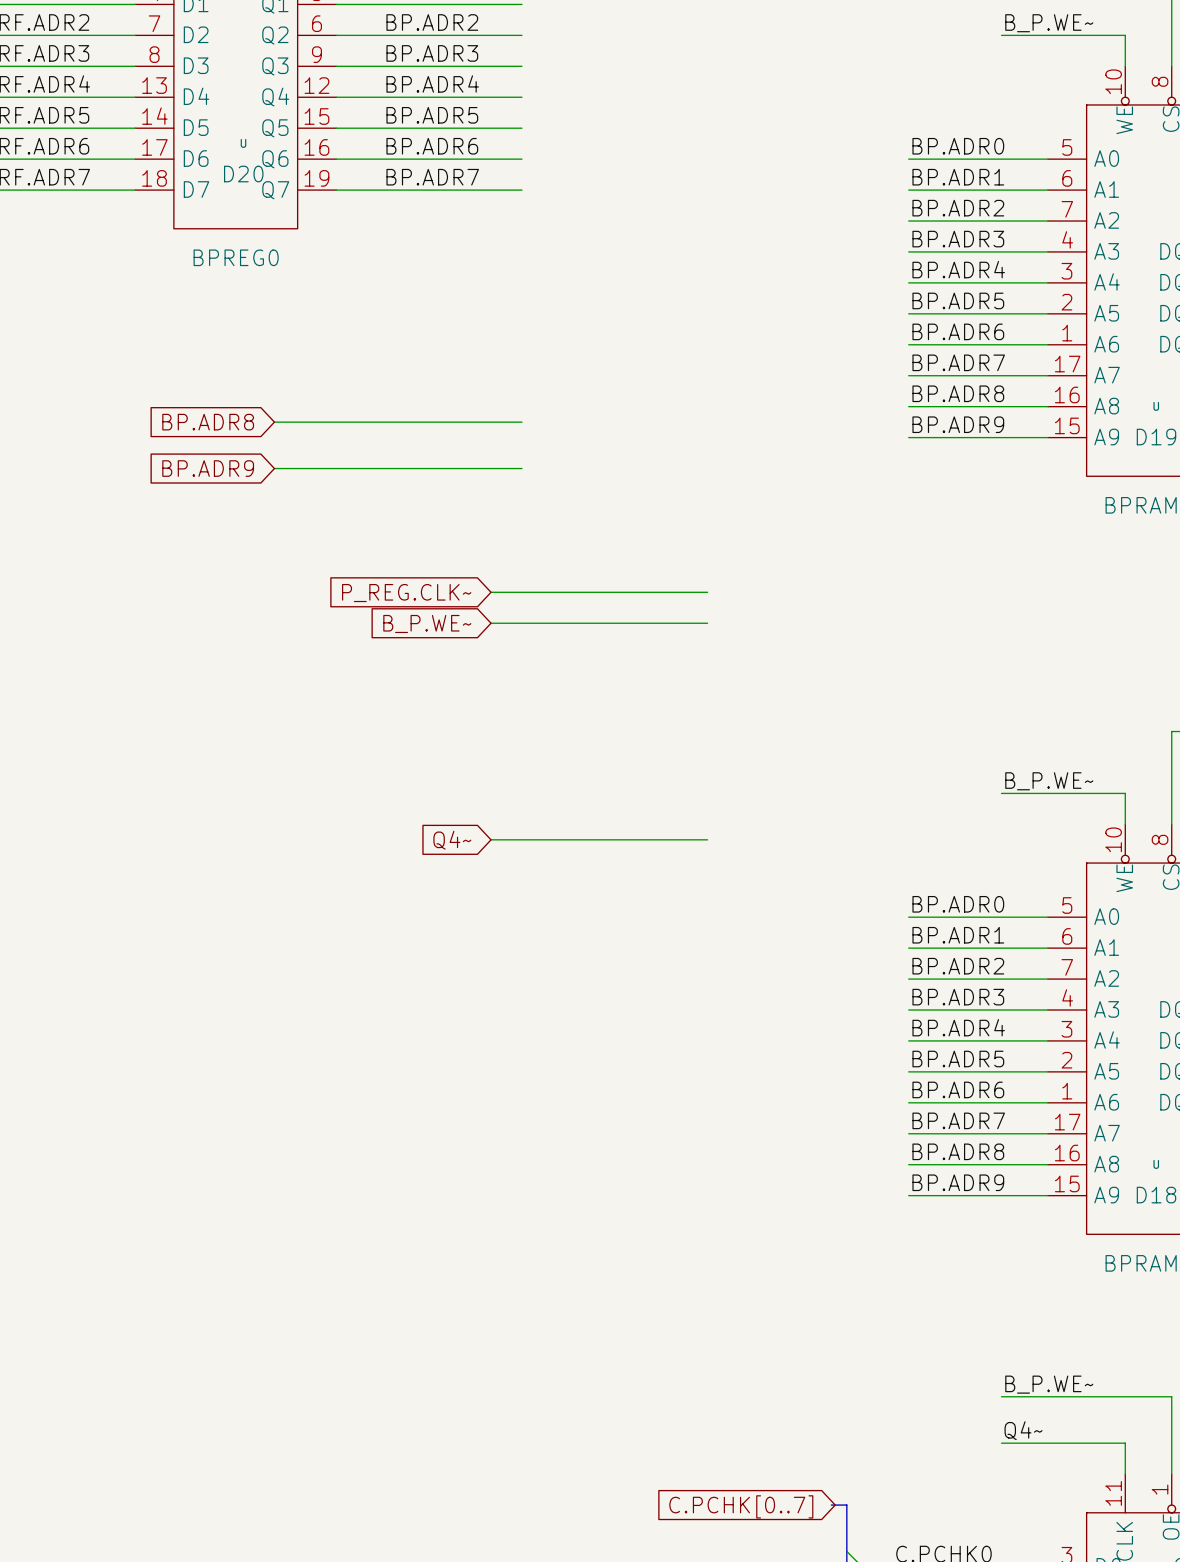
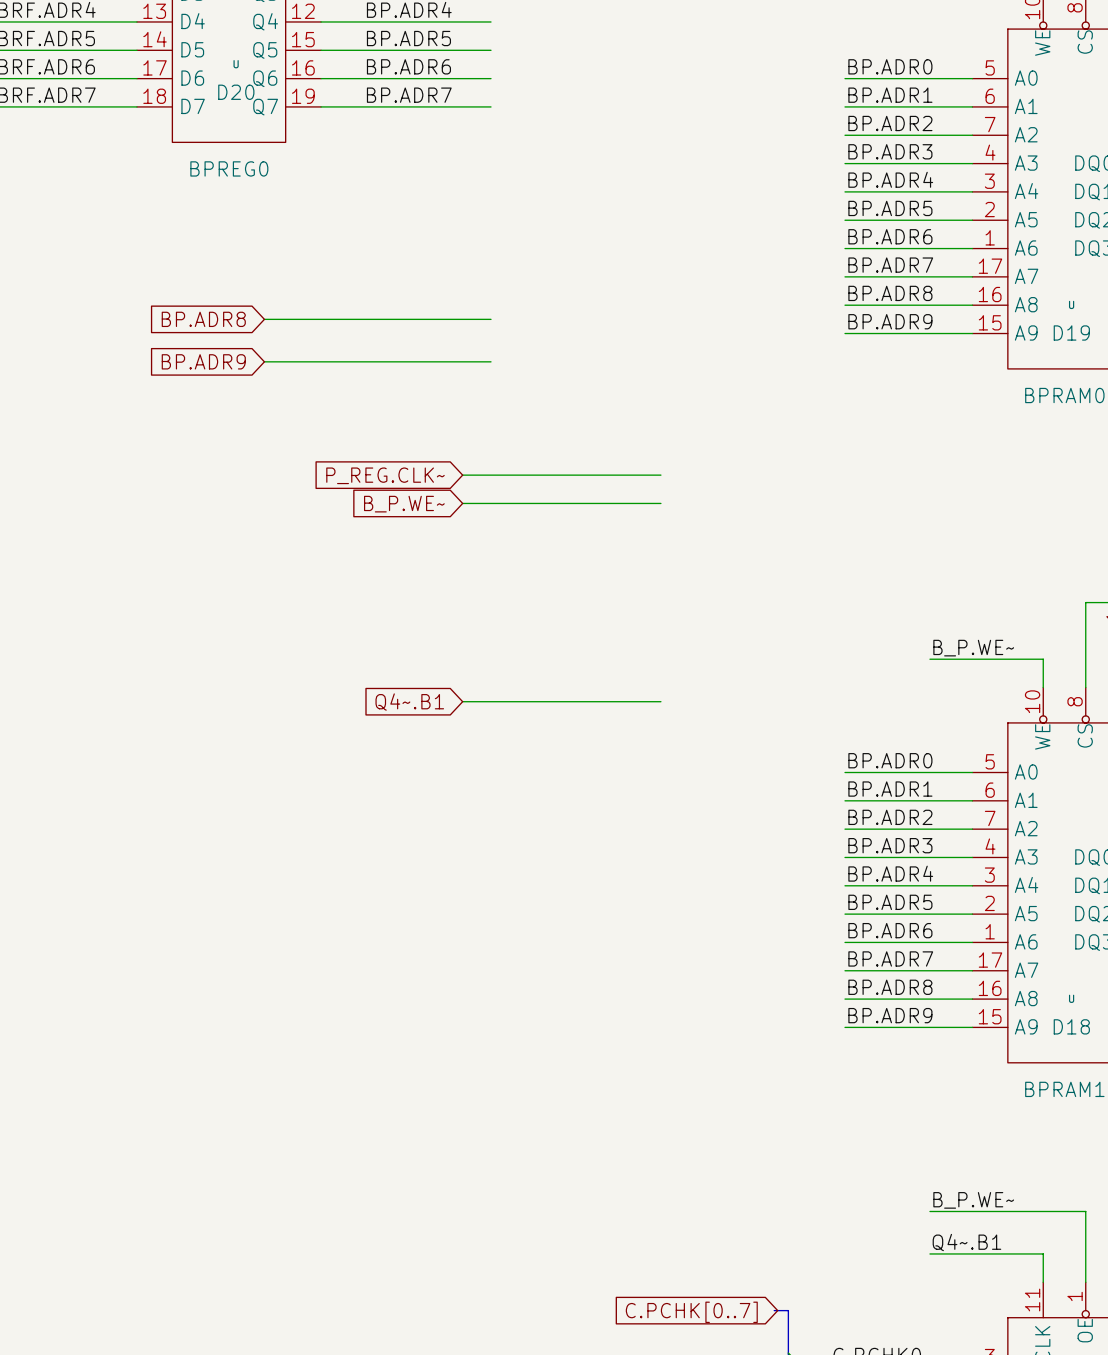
global label: Q4~ (452, 840) -> Q4~.B1 (409, 702)
label: Q4~ (1023, 1430) -> Q4~.B1 (966, 1242)

